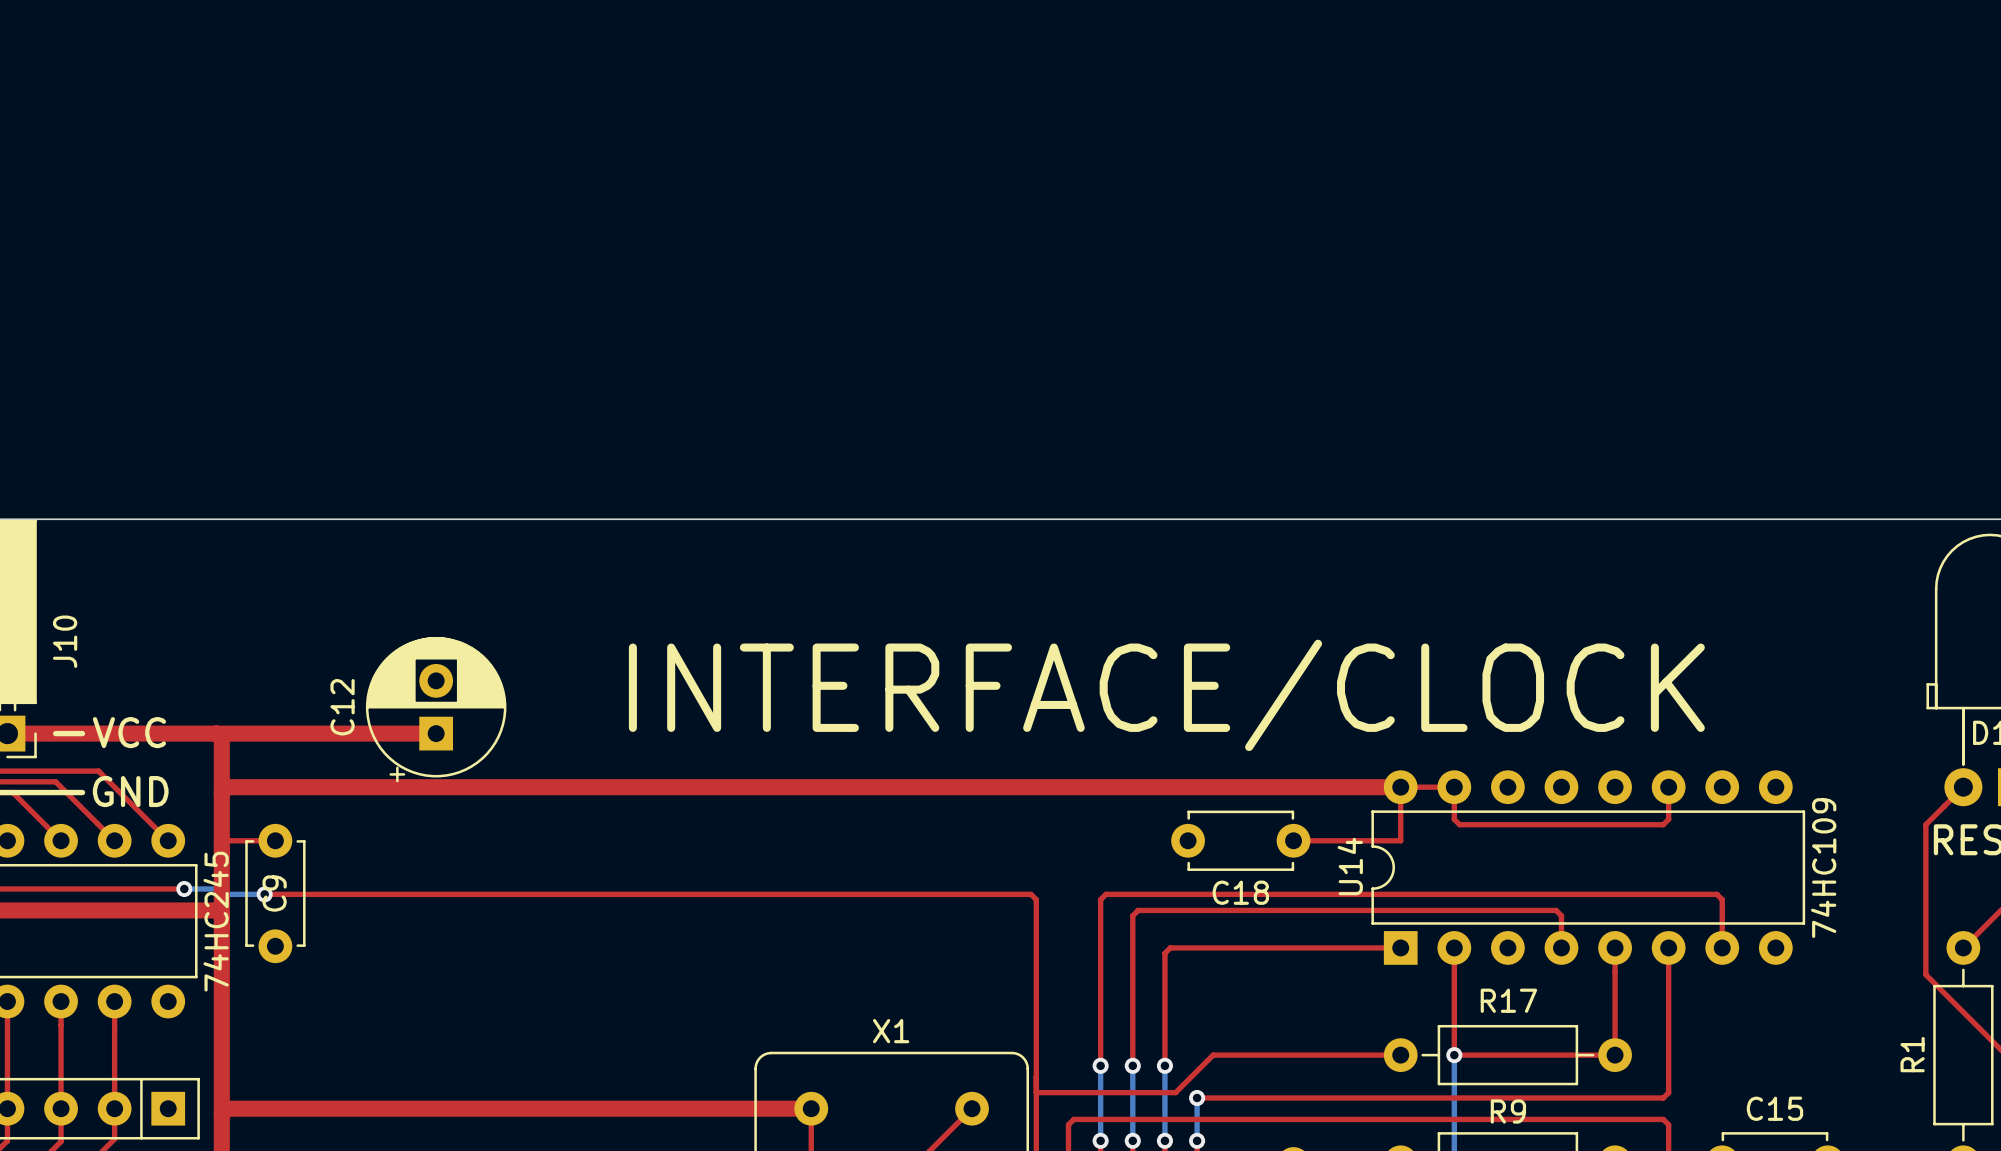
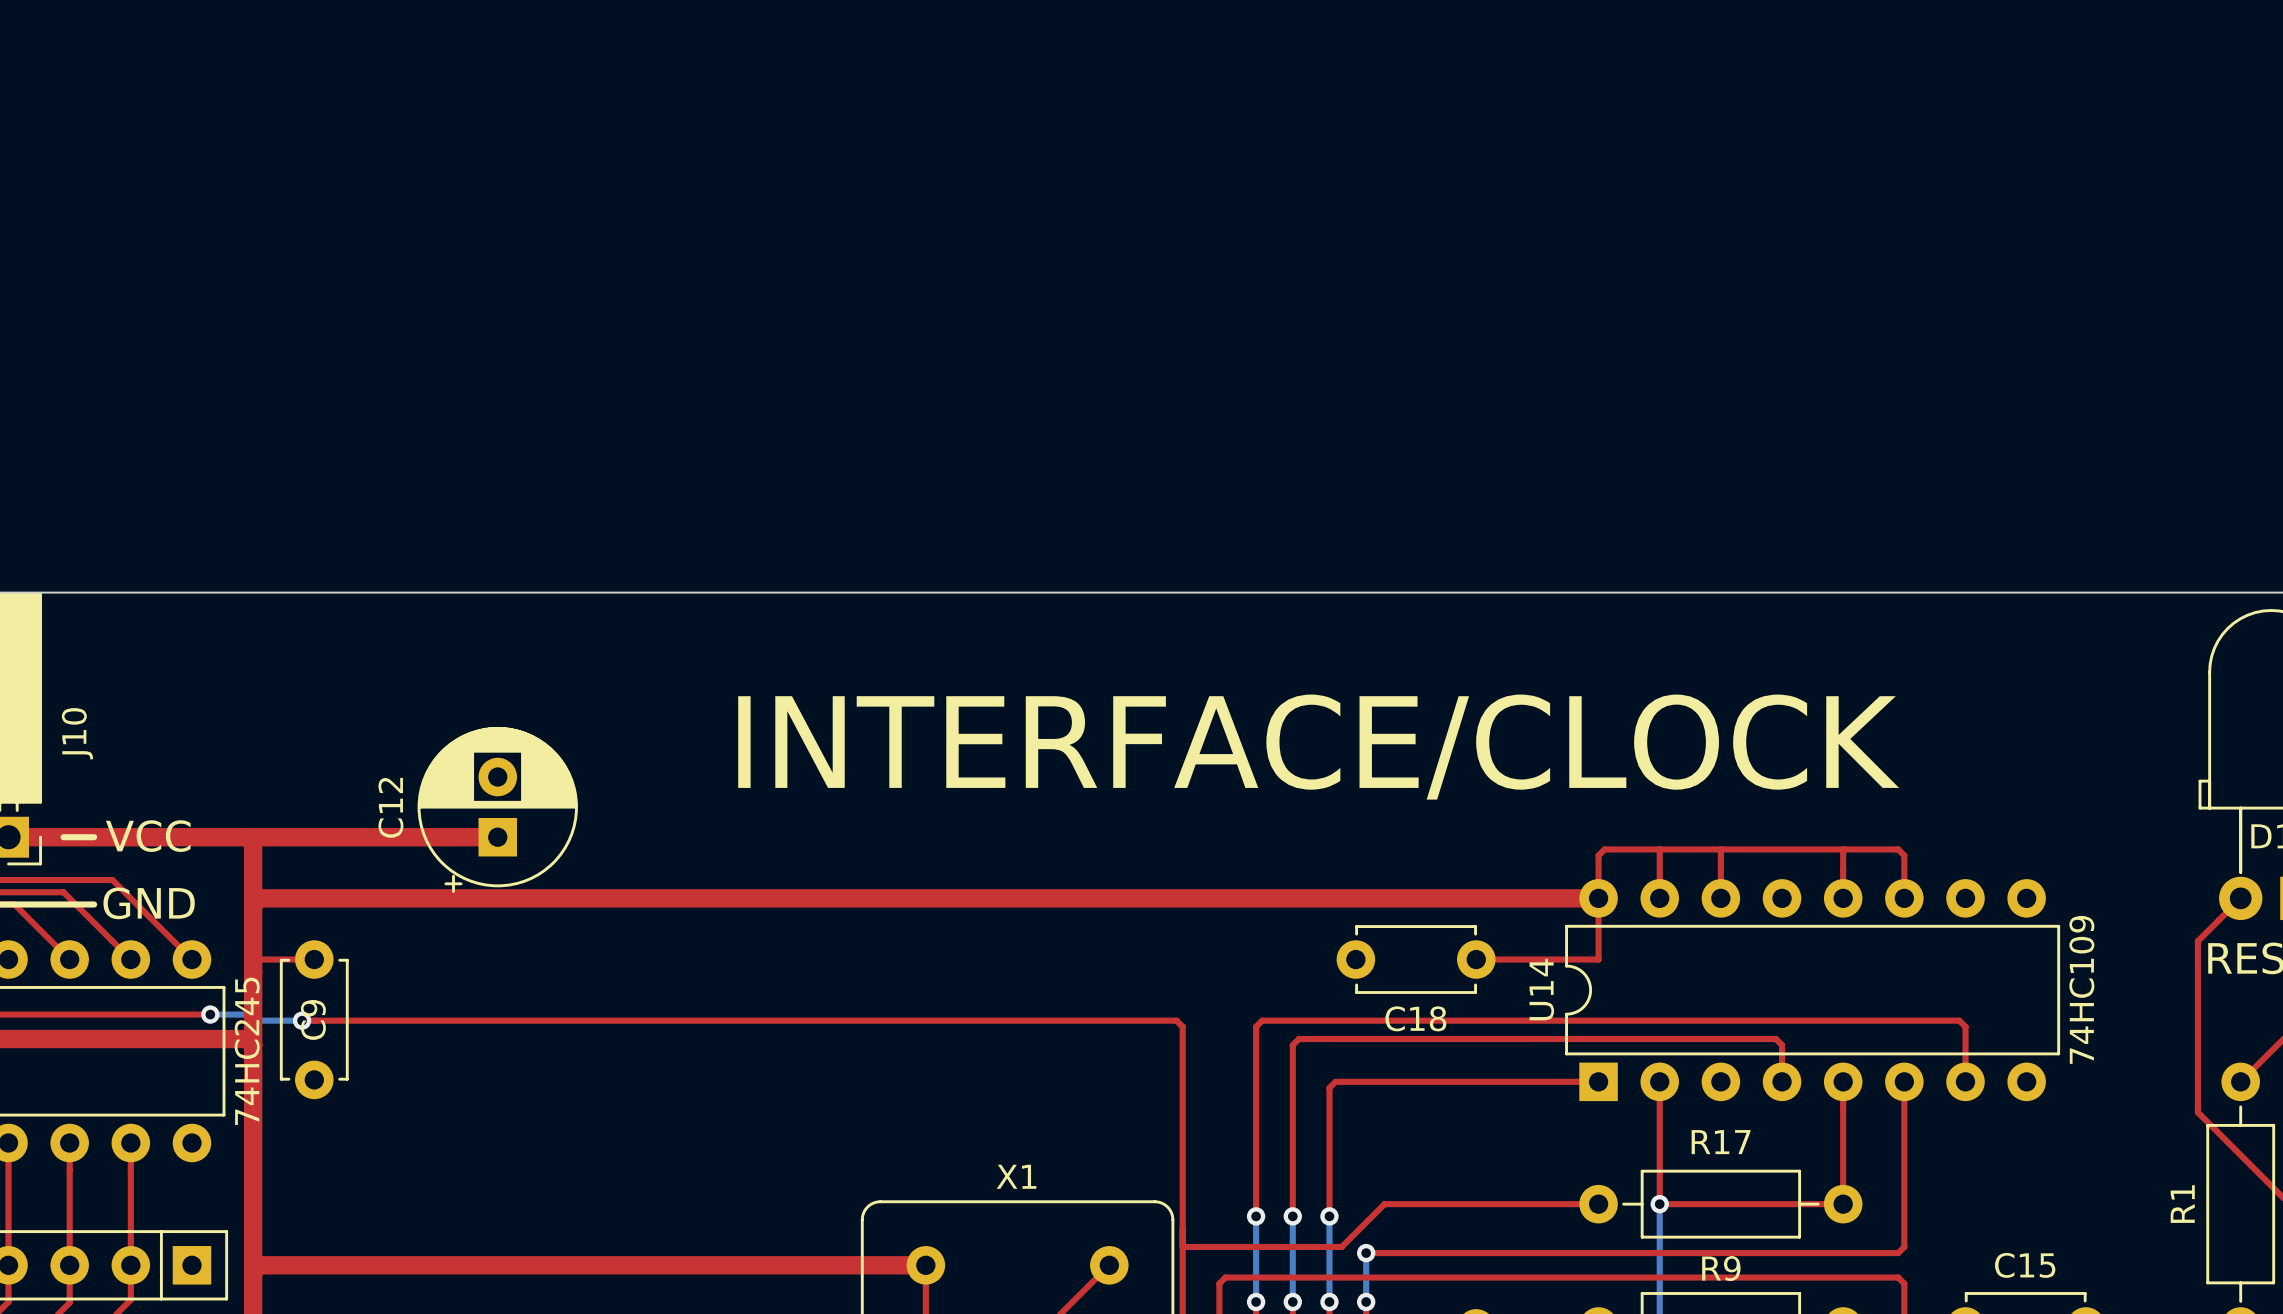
text position: INTERFACE/CLOCK (1166, 695) -> INTERFACE/CLOCK (1318, 747)
top track: none -> (1659, 849) (1659, 898)
top track: none -> (1720, 849) (1720, 898)
top track: none -> (1843, 849) (1843, 898)
top track: (1400, 787) (1454, 787) (1454, 819) (1459, 824) (1663, 824) (1668, 819) (1668, 787) -> (1598, 898) (1598, 855) (1604, 849) (1898, 849) (1904, 855) (1904, 898)

